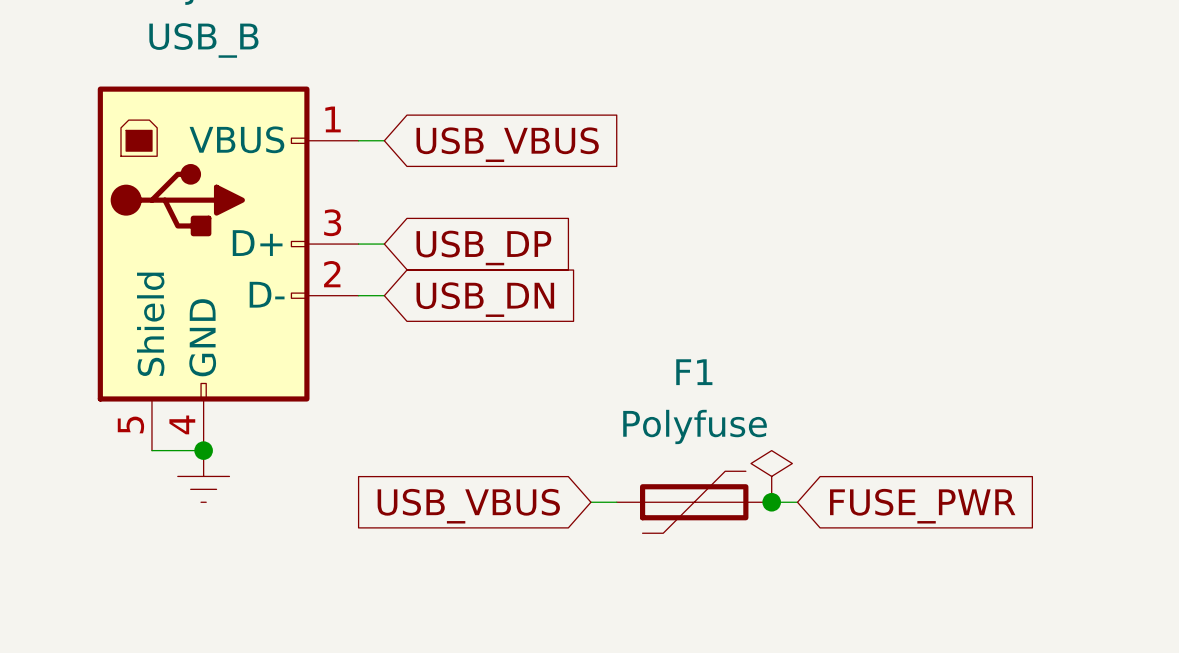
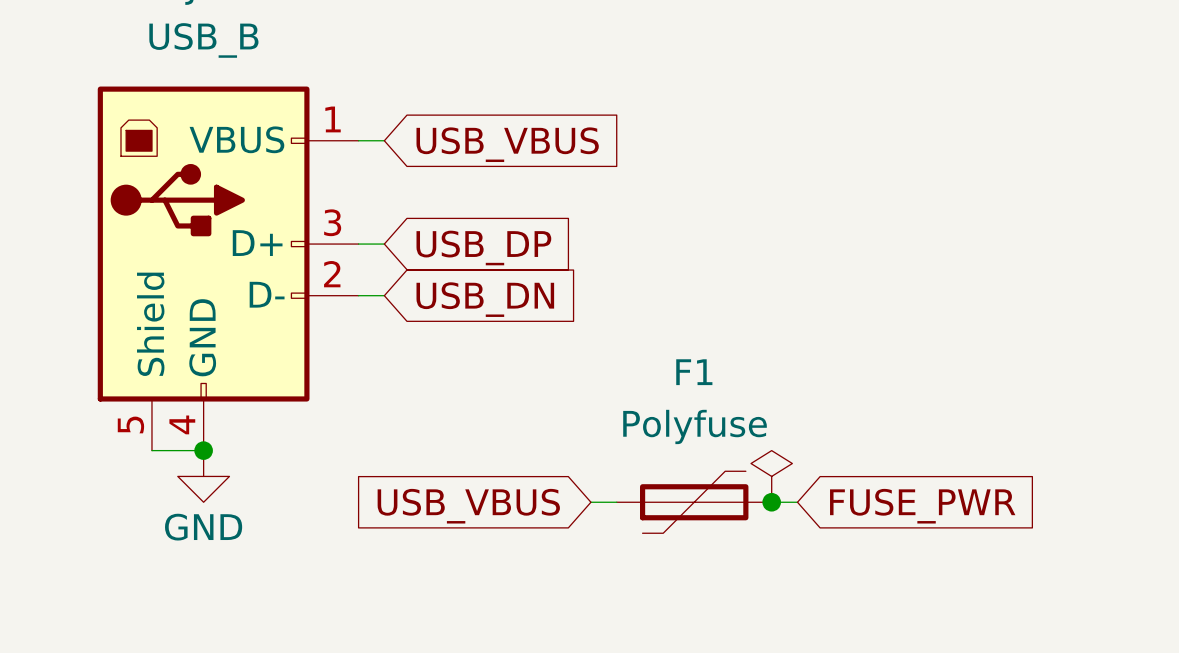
power symbol shape: [177, 450, 230, 503] -> [177, 450, 230, 503]
power symbol text: none -> GND (203, 527)

